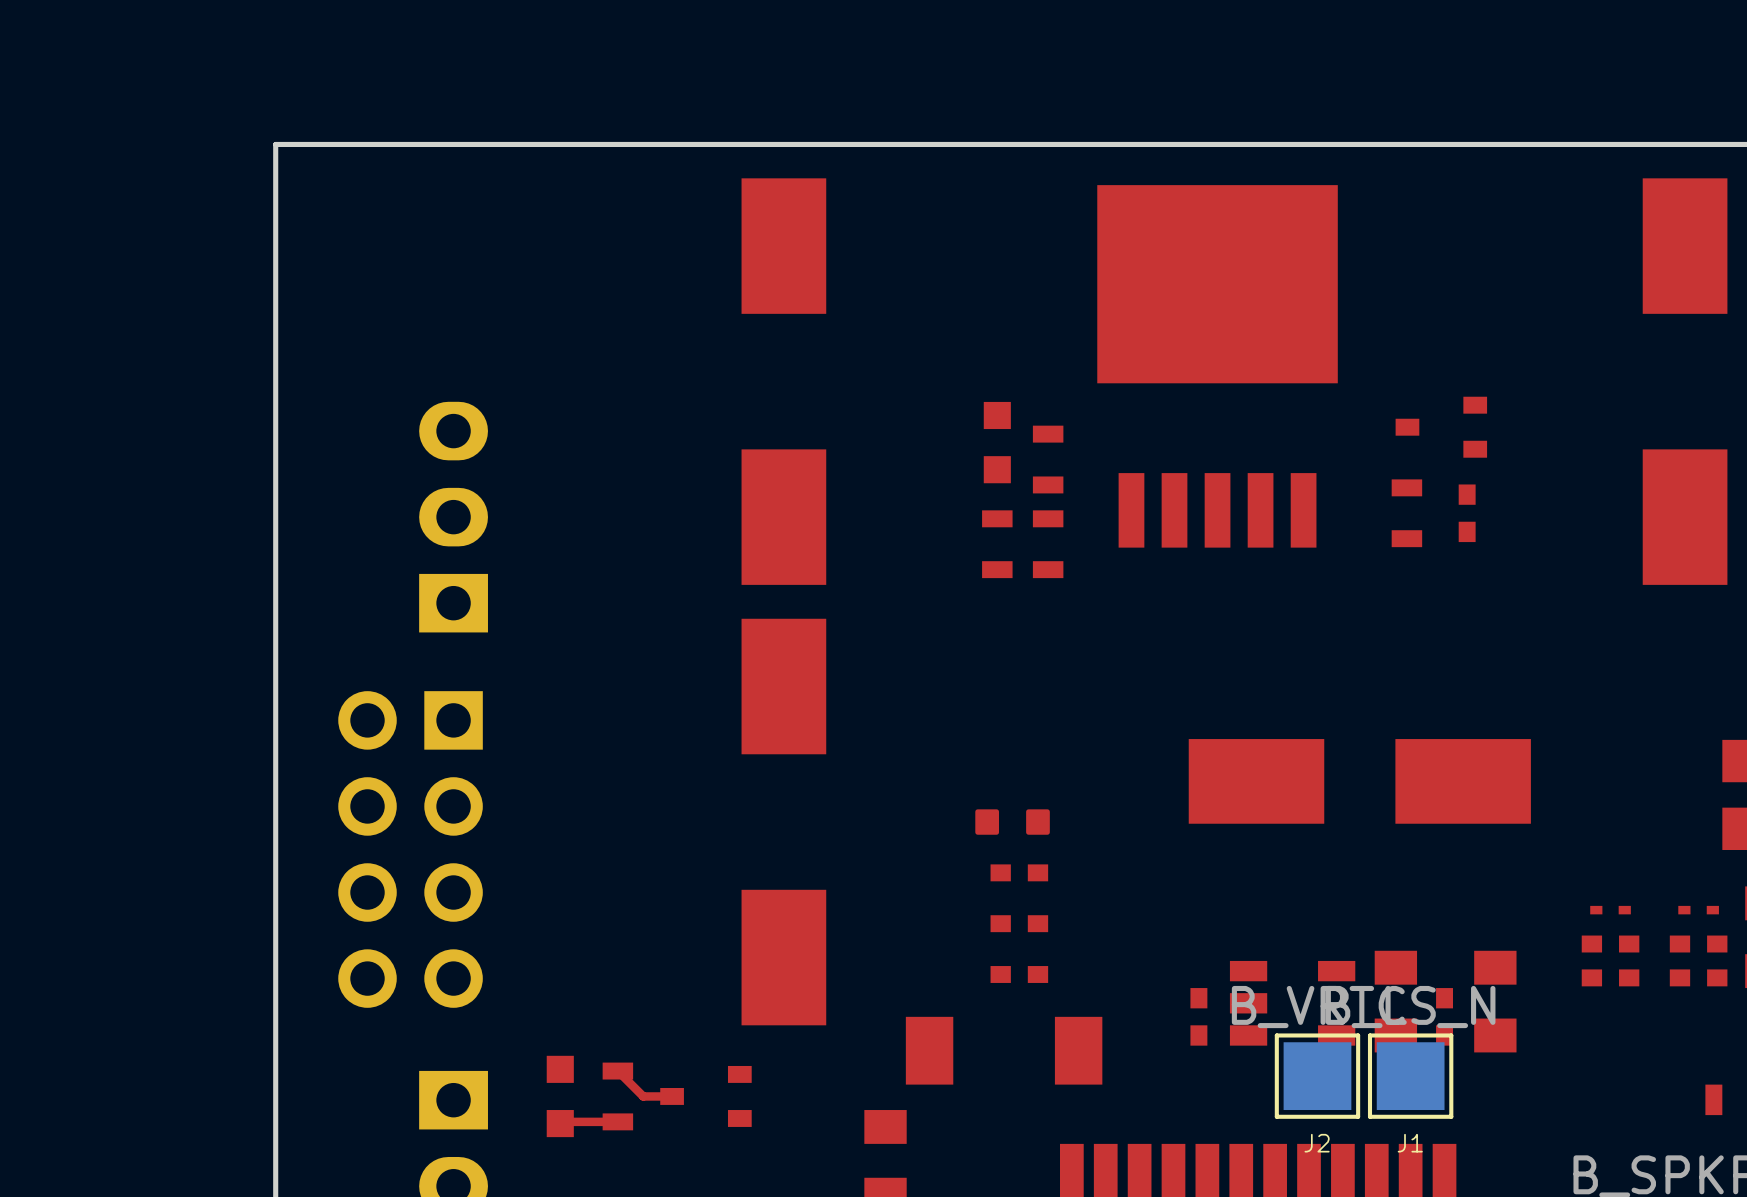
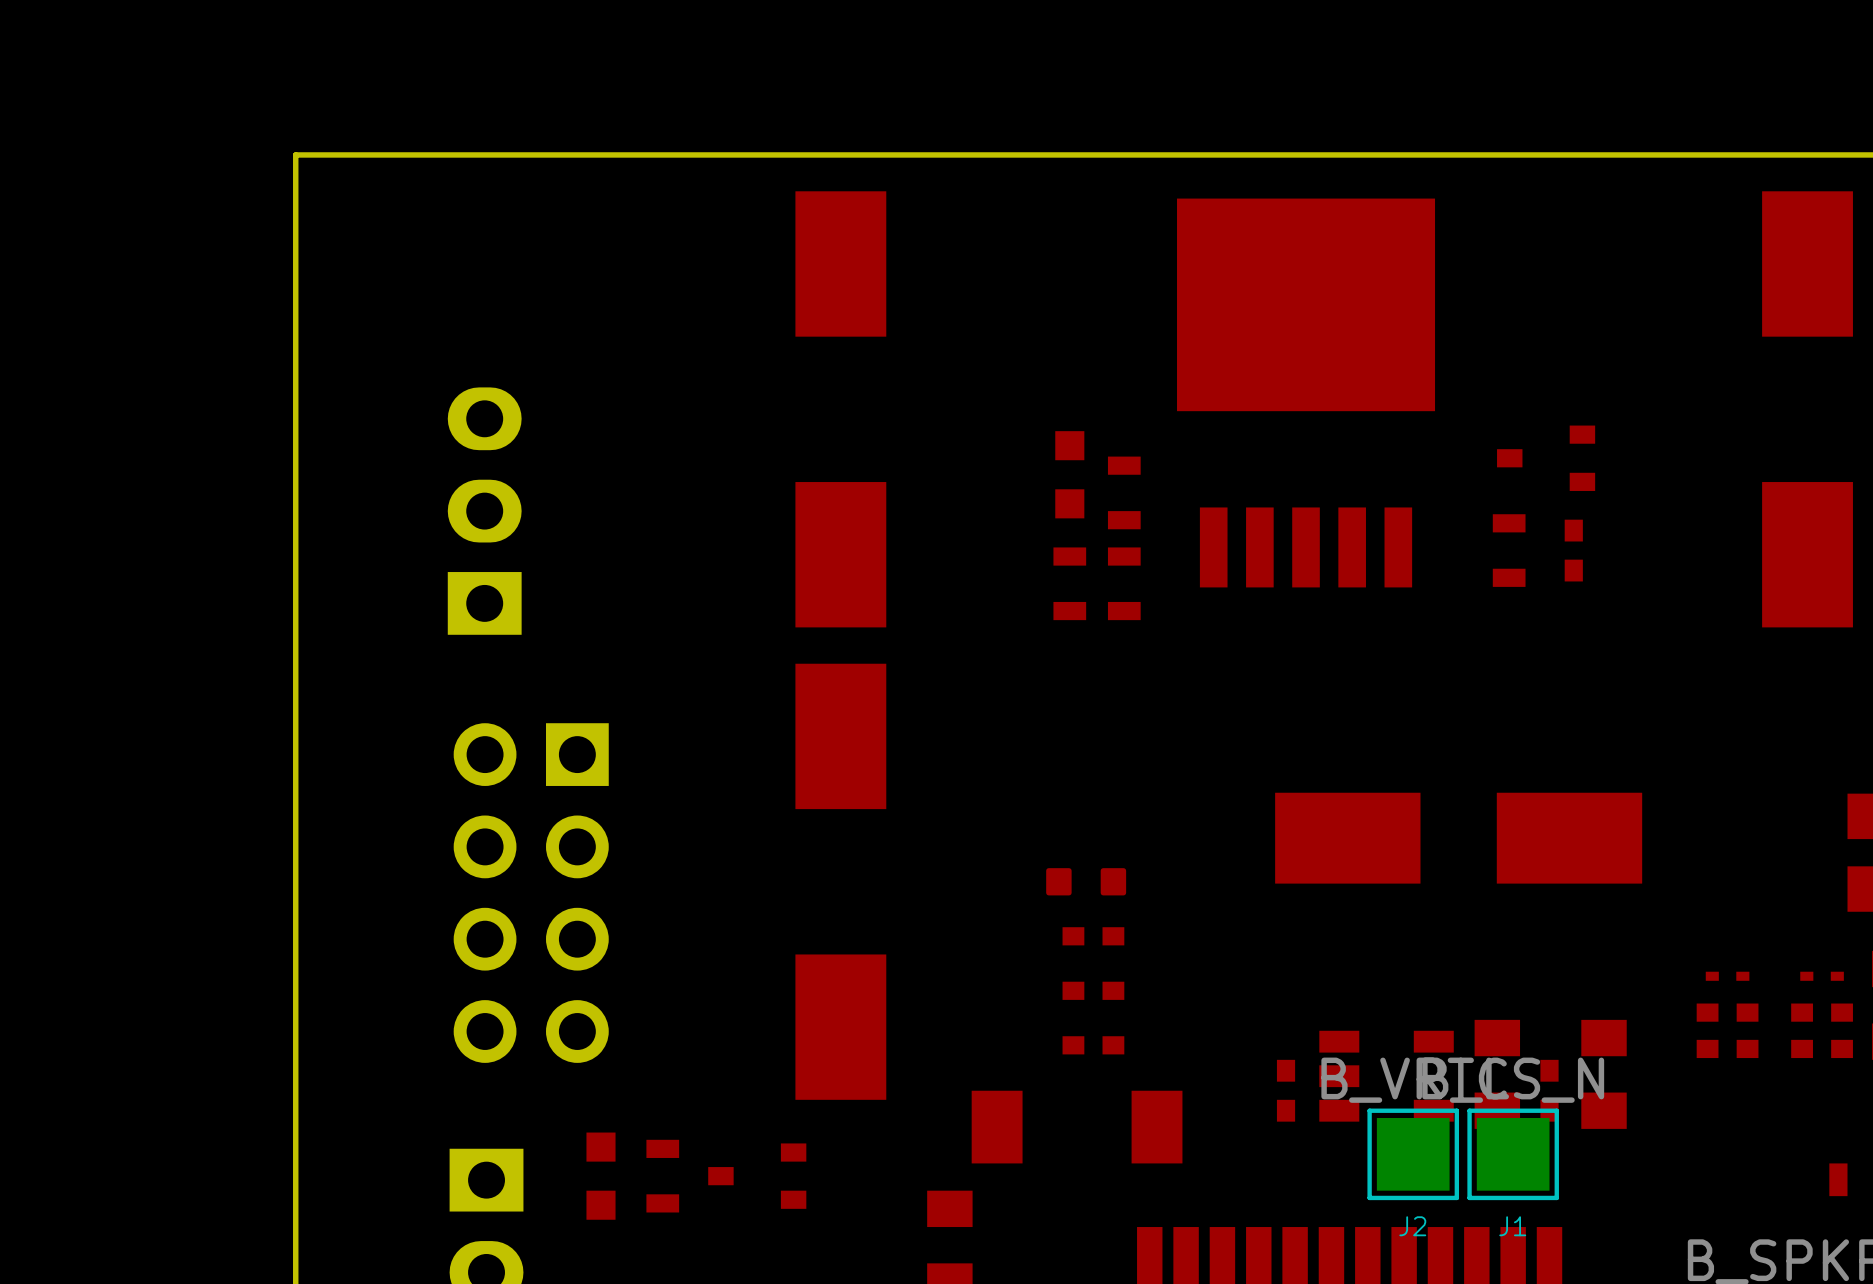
part position: (453, 517) -> (484, 511)
part position: (410, 849) -> (531, 893)
top track: (617, 1071) (643, 1096) (672, 1096) -> none
top track: (617, 1121) (561, 1121) (560, 1123) -> none

